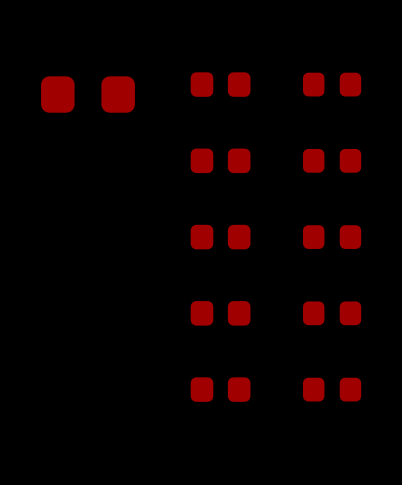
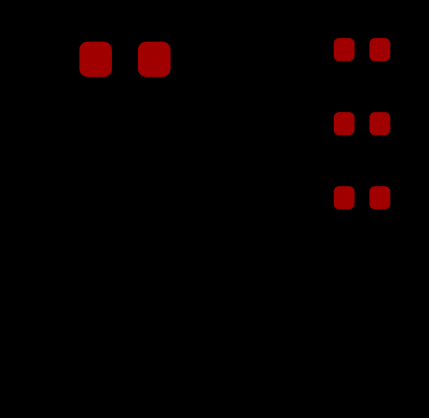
part: (220, 84) -> none
part: (220, 160) -> none
part: (220, 237) -> none
part: (220, 313) -> none
part: (332, 313) -> none
part: (220, 389) -> none
part: (332, 389) -> none

